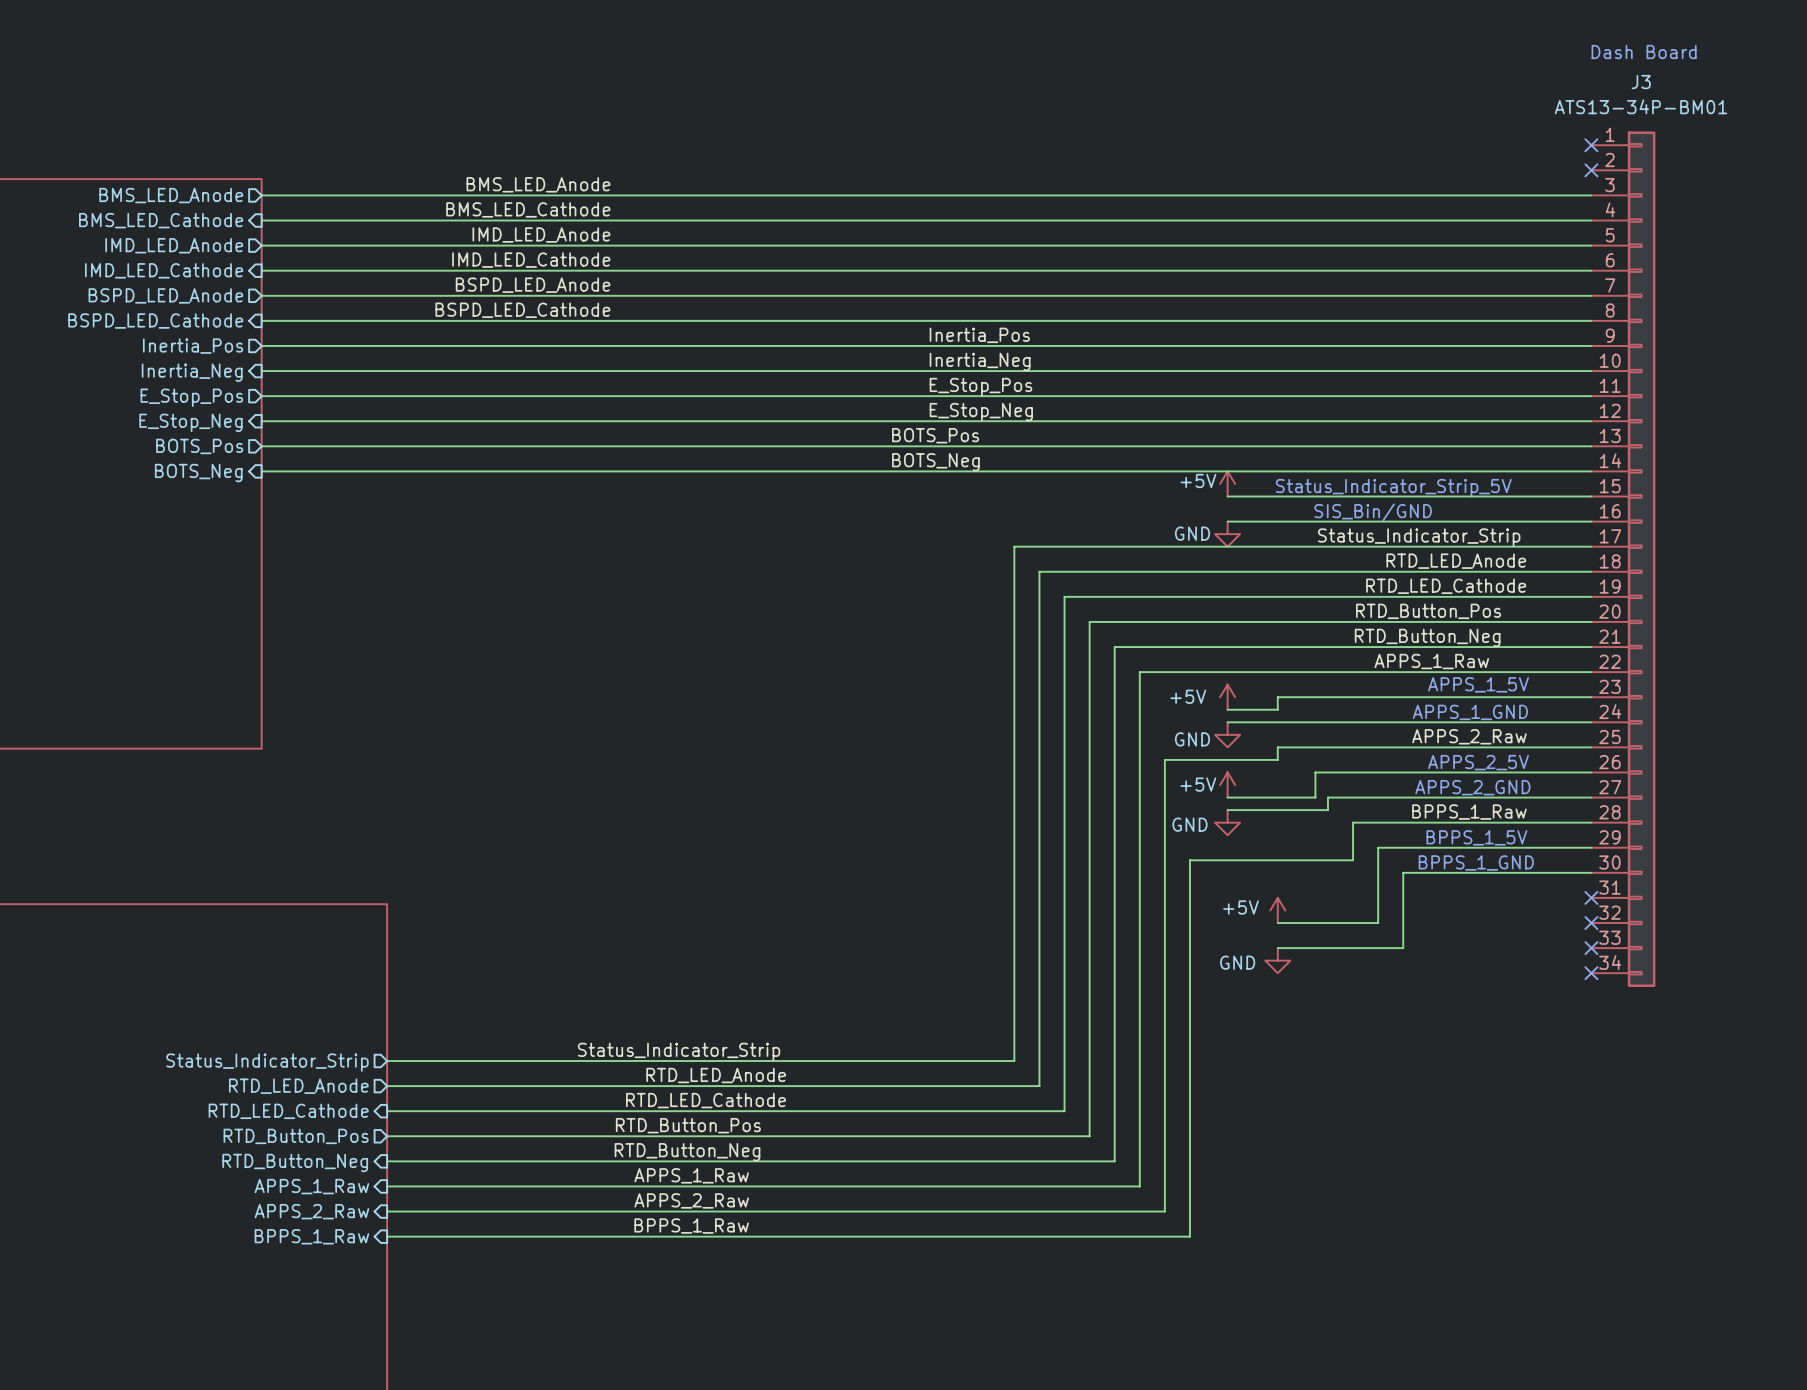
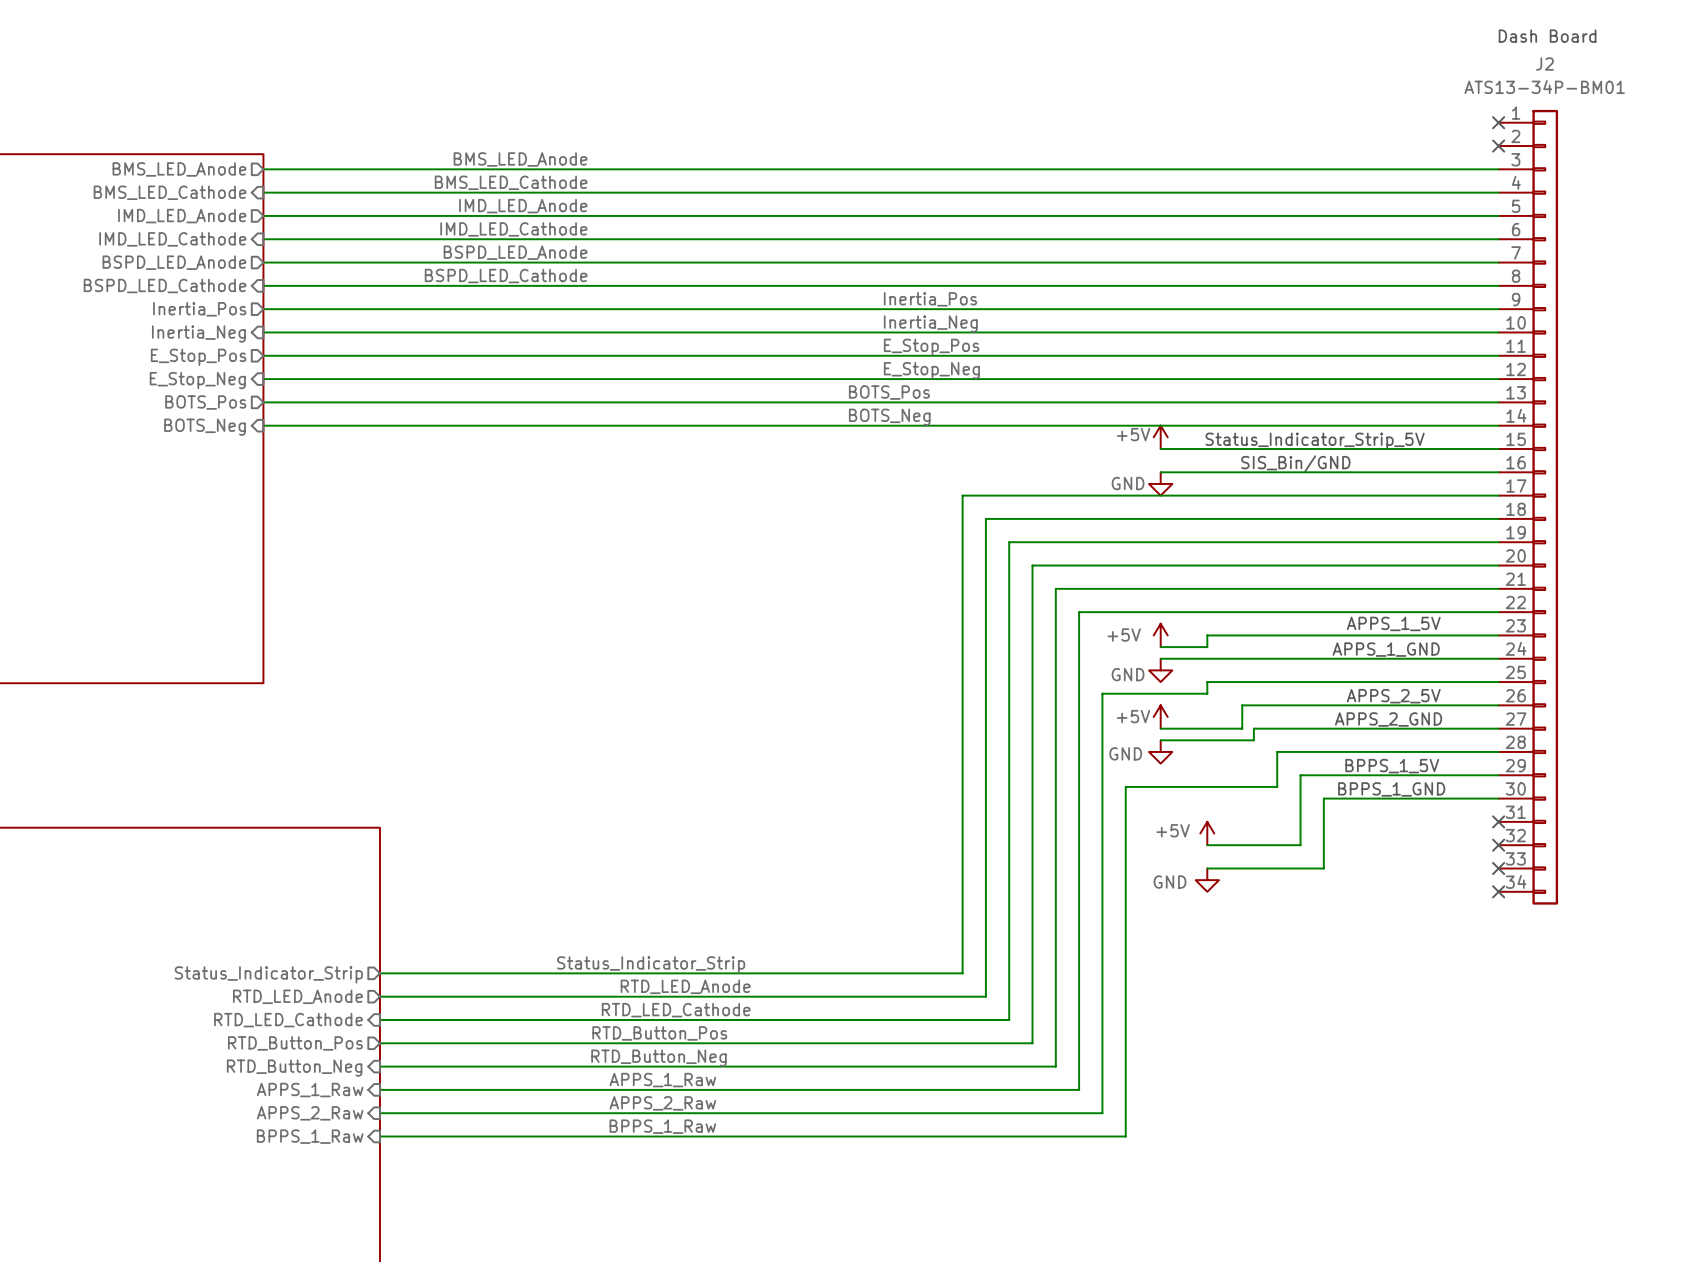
J3 name: J3 (1641, 82) -> J2 (1544, 64)
label: Status_Indicator_Strip (1419, 537) -> none
label: RTD_LED_Anode (1456, 561) -> none
label: RTD_LED_Cathode (1446, 586) -> none
label: RTD_Button_Pos (1428, 611) -> none
label: RTD_Button_Neg (1427, 637) -> none
label: APPS_1_Raw (1431, 661) -> none
label: APPS_2_Raw (1469, 736) -> none
label: BPPS_1_Raw (1469, 812) -> none

